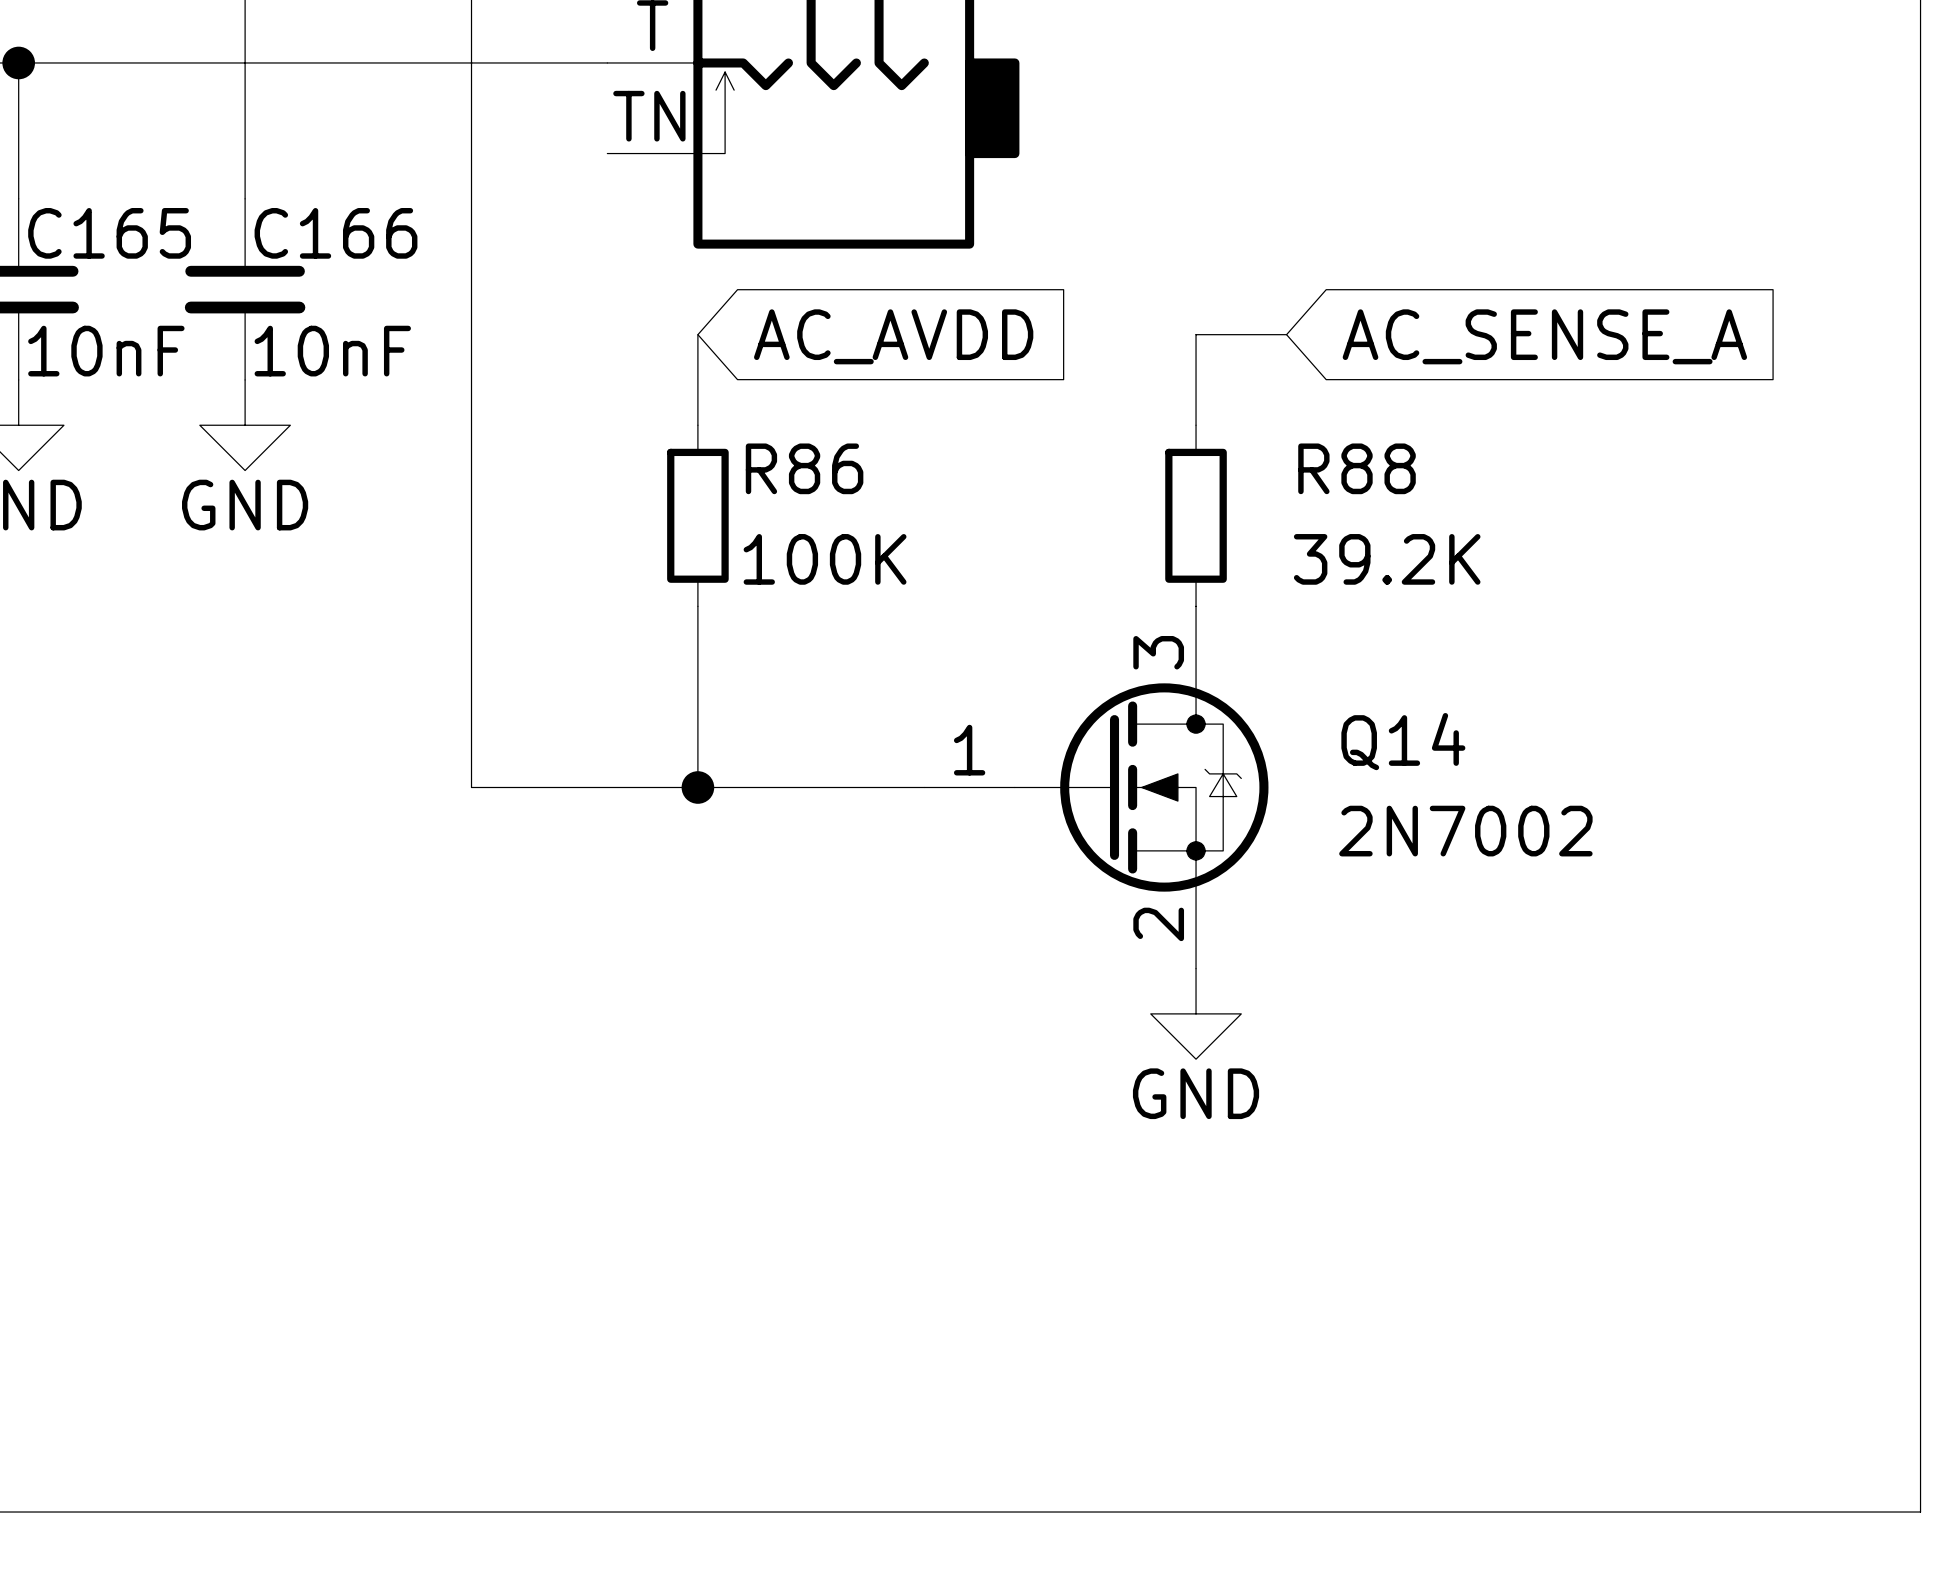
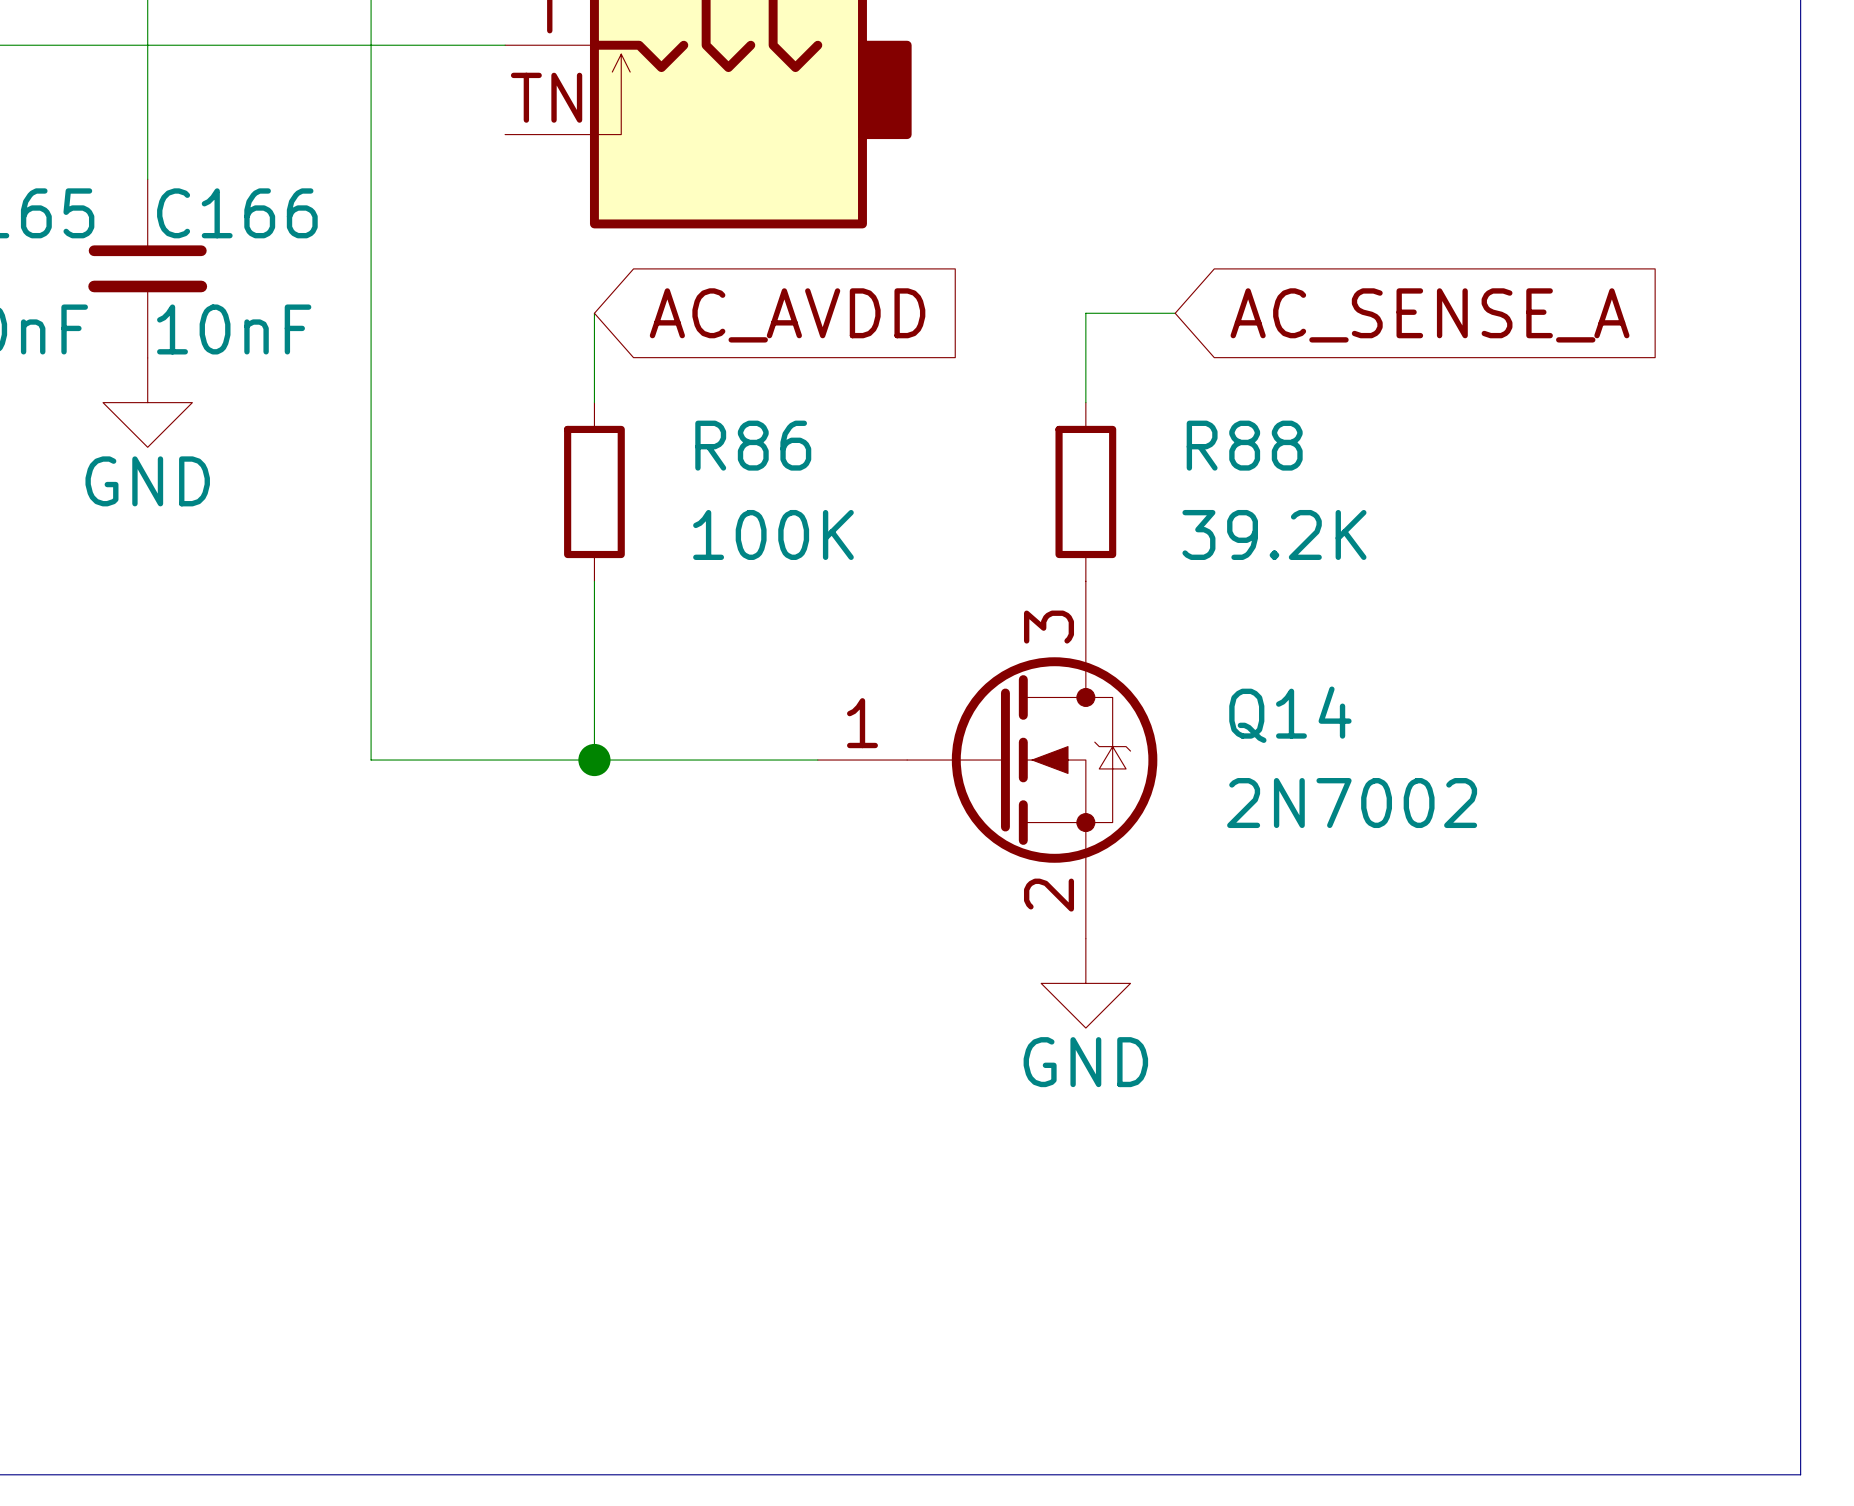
R86 name position: R86 (804, 468) -> R86 (753, 445)
R86 value position: 100K (825, 559) -> 100K (773, 534)

